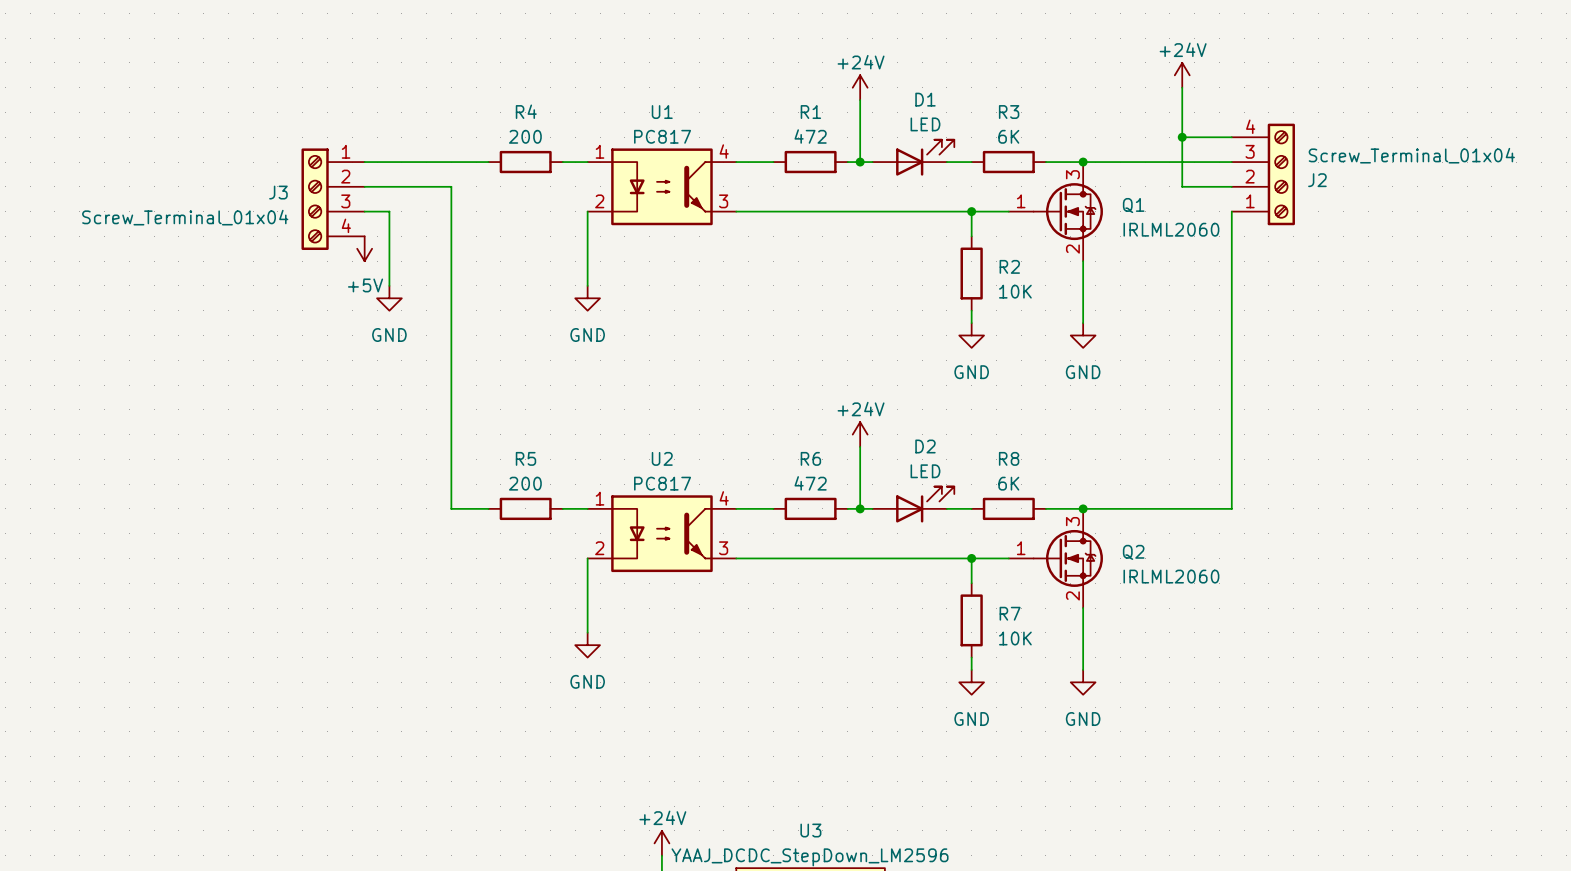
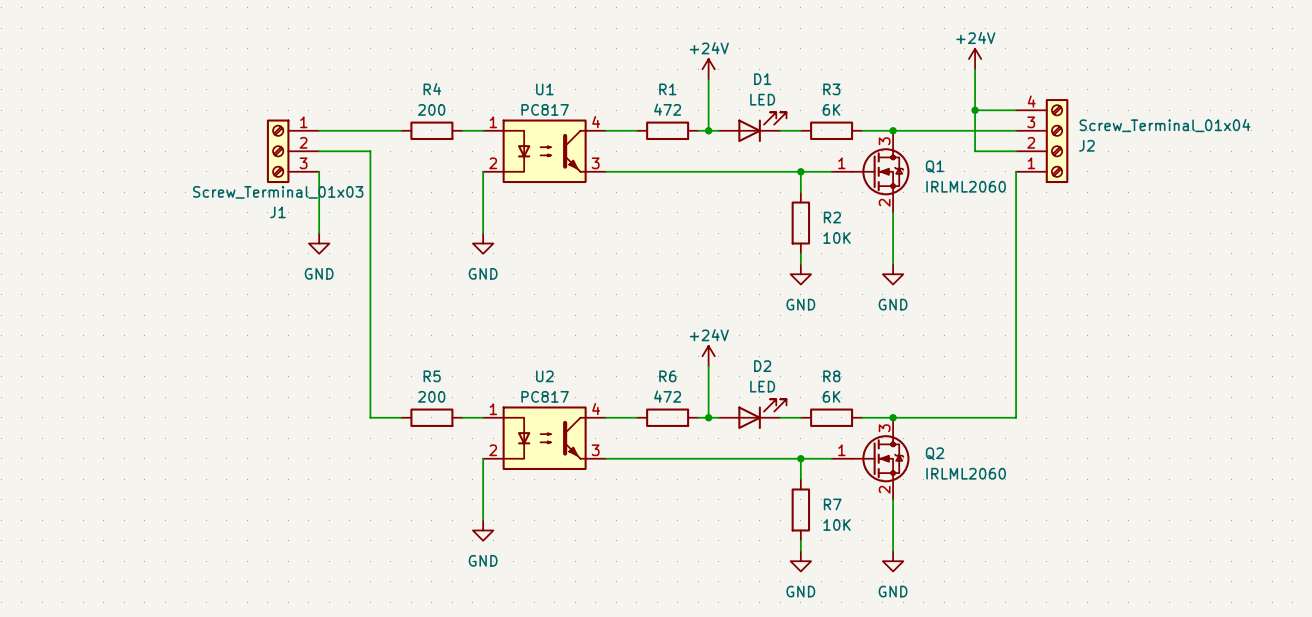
J1: none -> Screw_Terminal_01x03 (293, 151)
J3: Screw_Terminal_01x04 (333, 199) -> none
power symbol: +5V (364, 248) -> none

